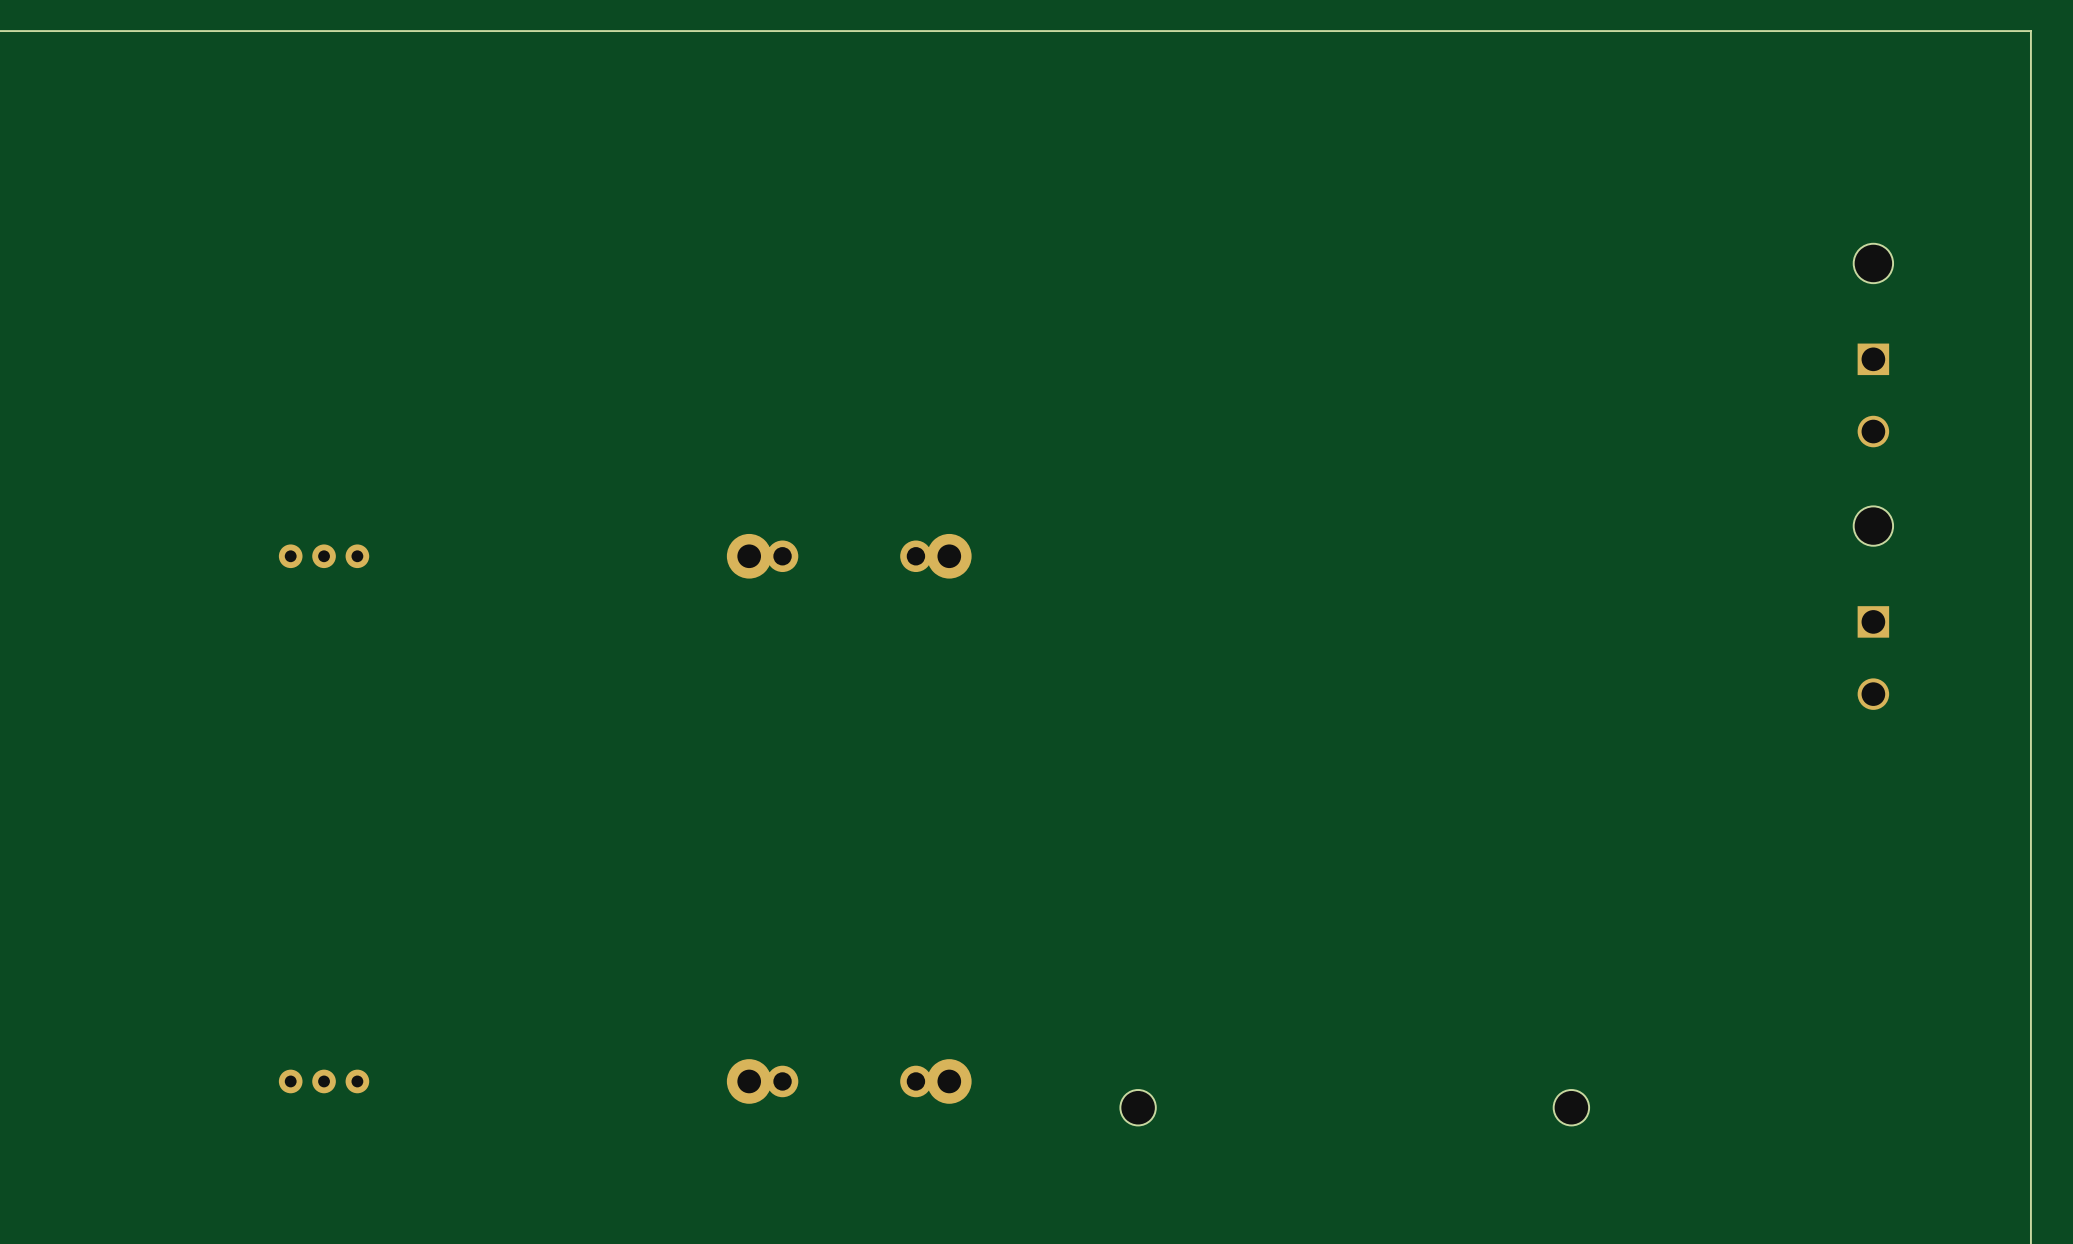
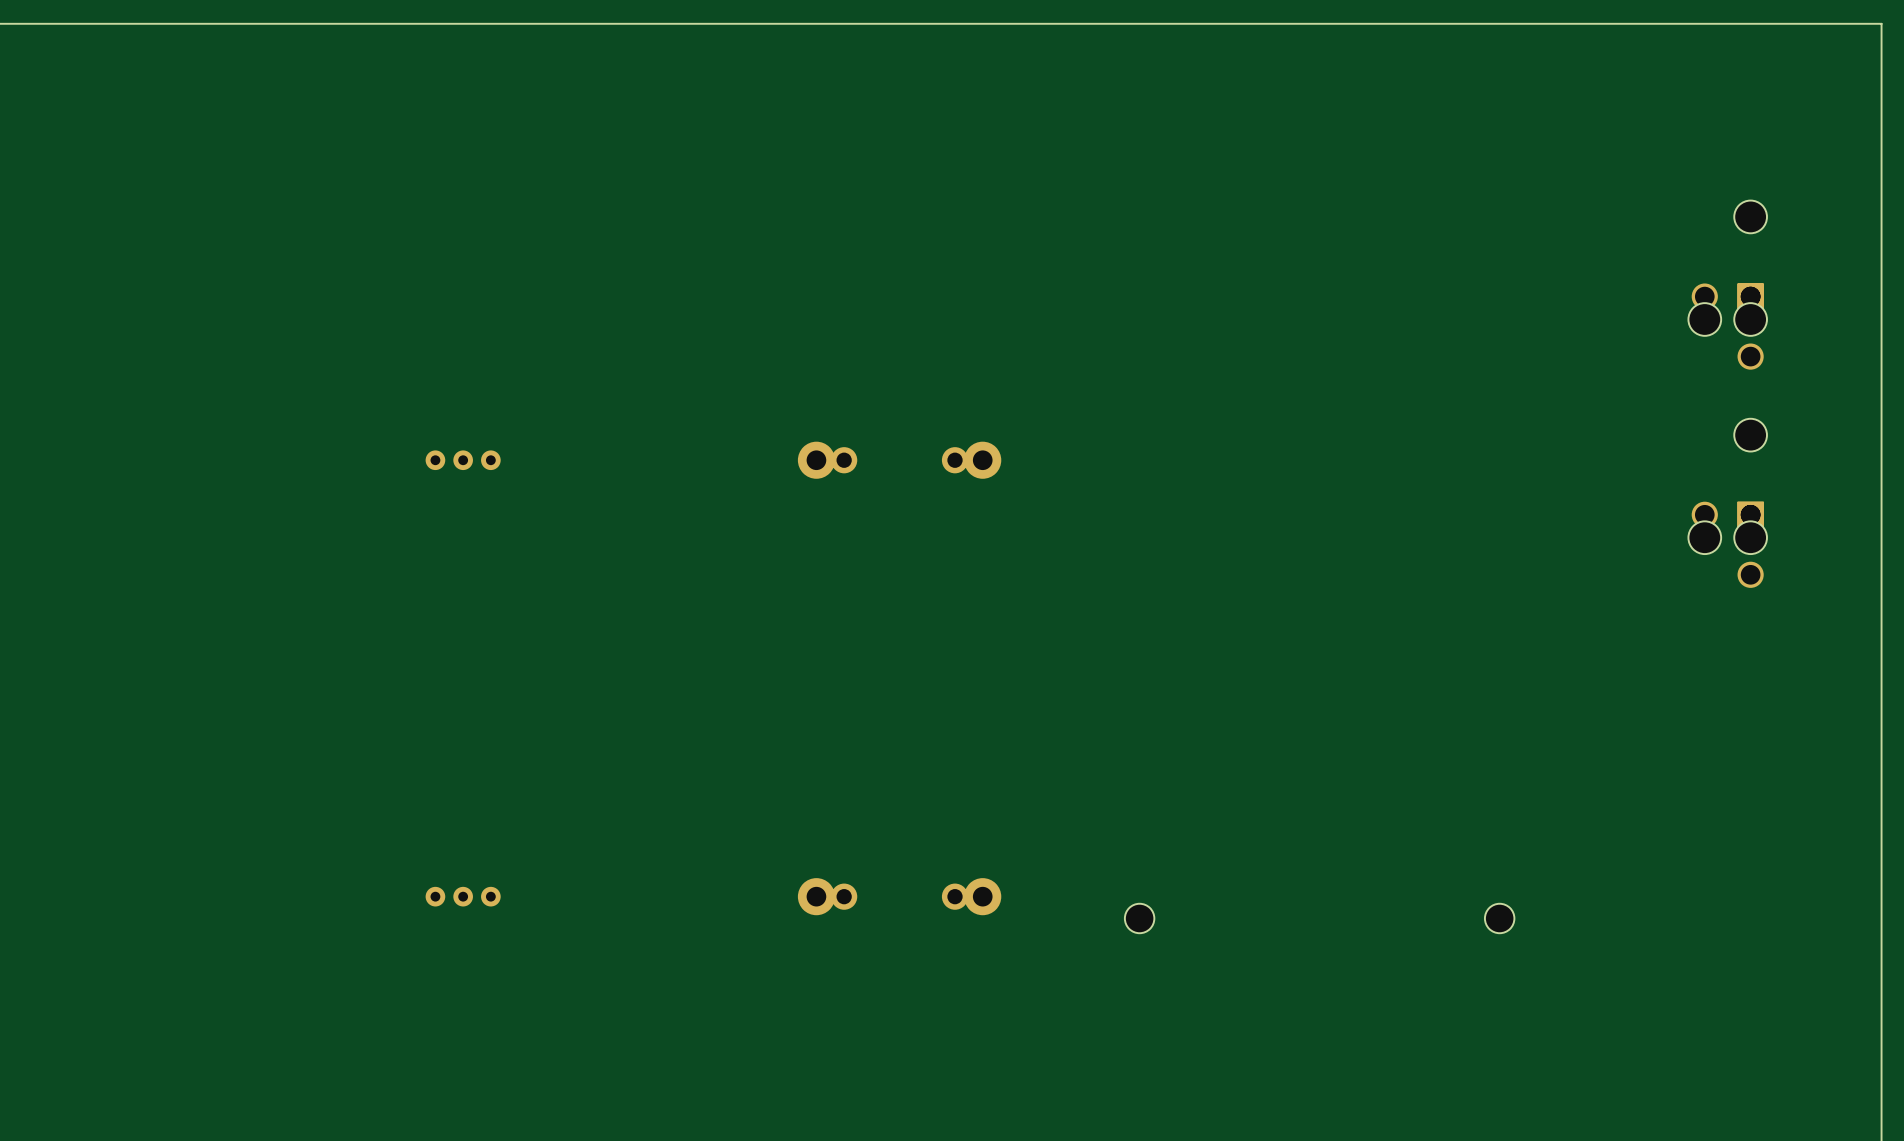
part: none -> (1727, 309)
part: none -> (1727, 527)

